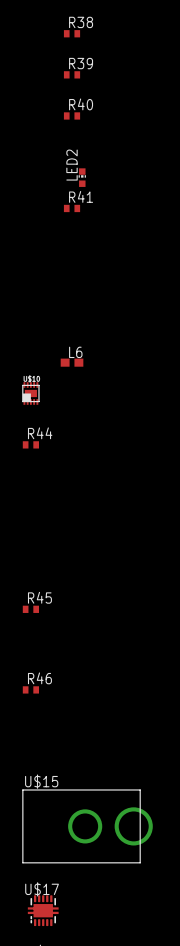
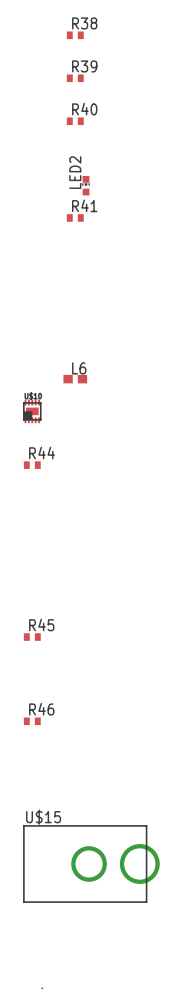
U$17: (43, 910) -> none

